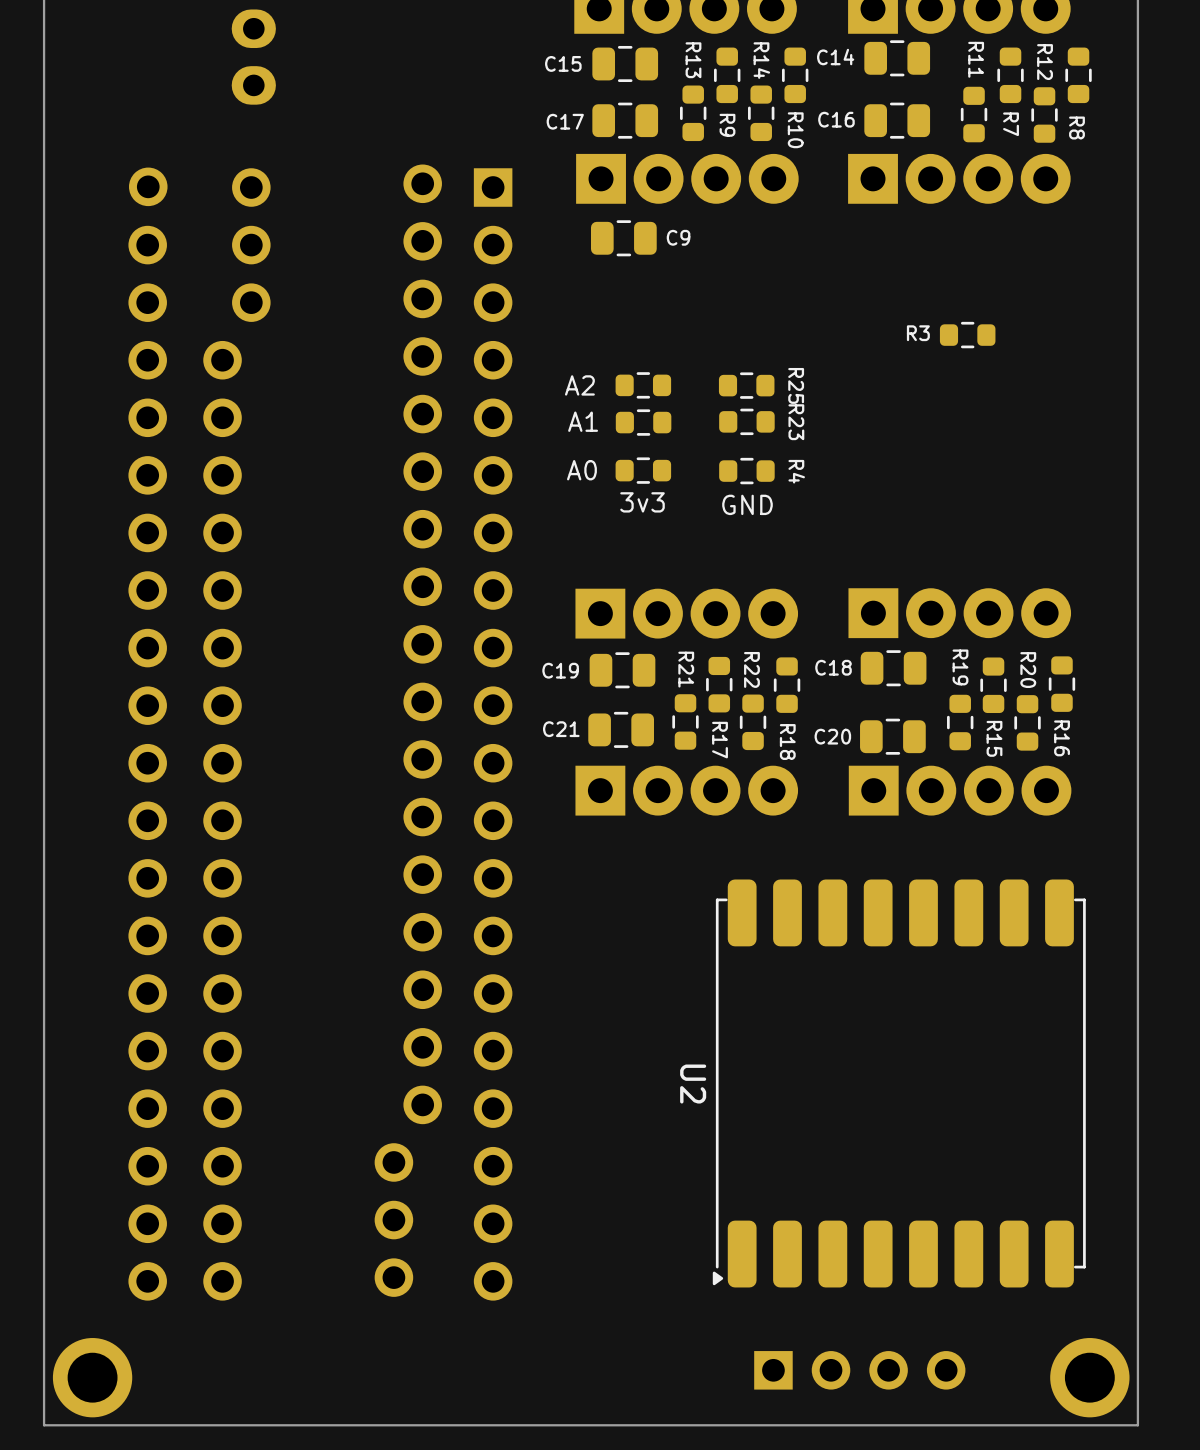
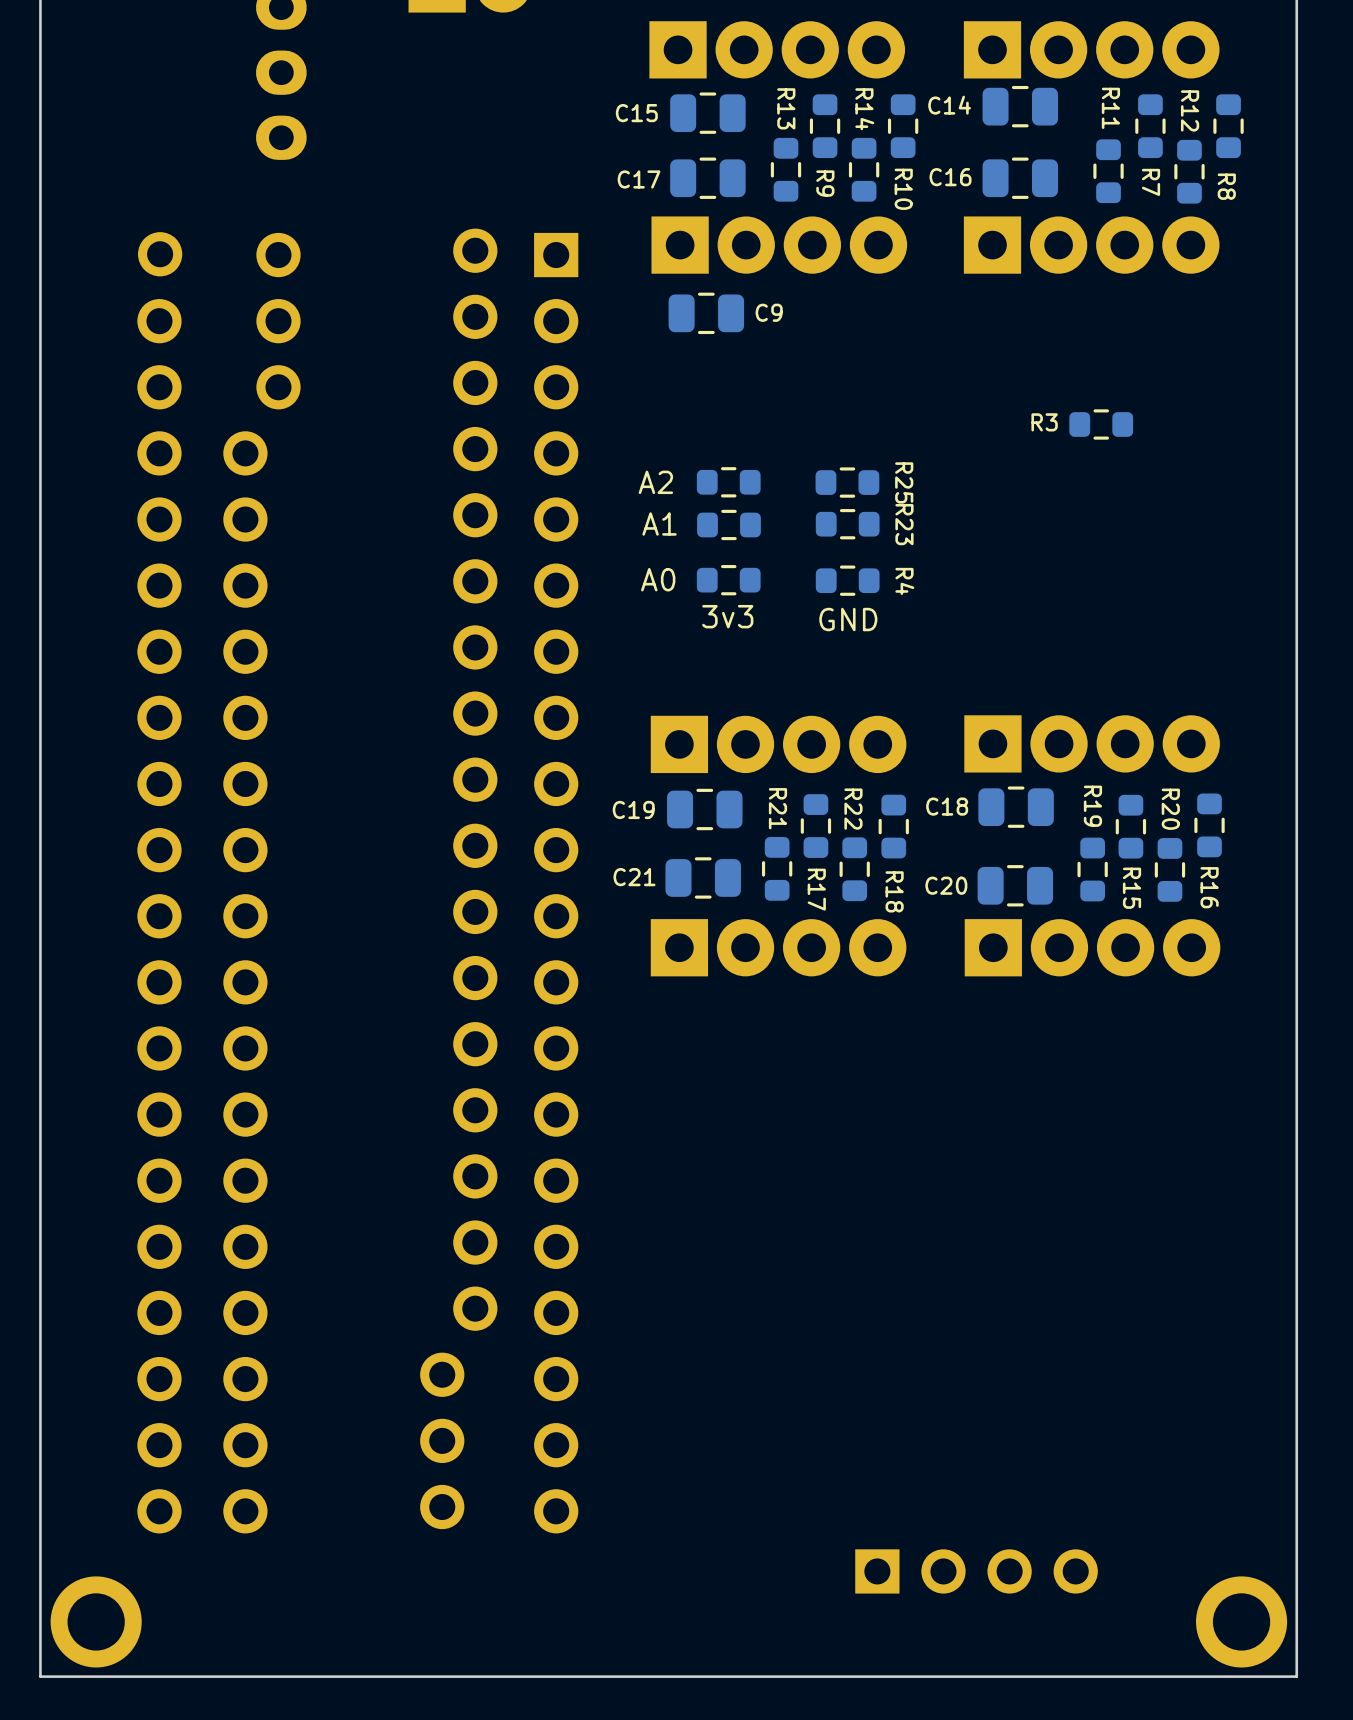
U2: (899, 1083) -> none
part position: (859, 1370) -> (976, 1571)

